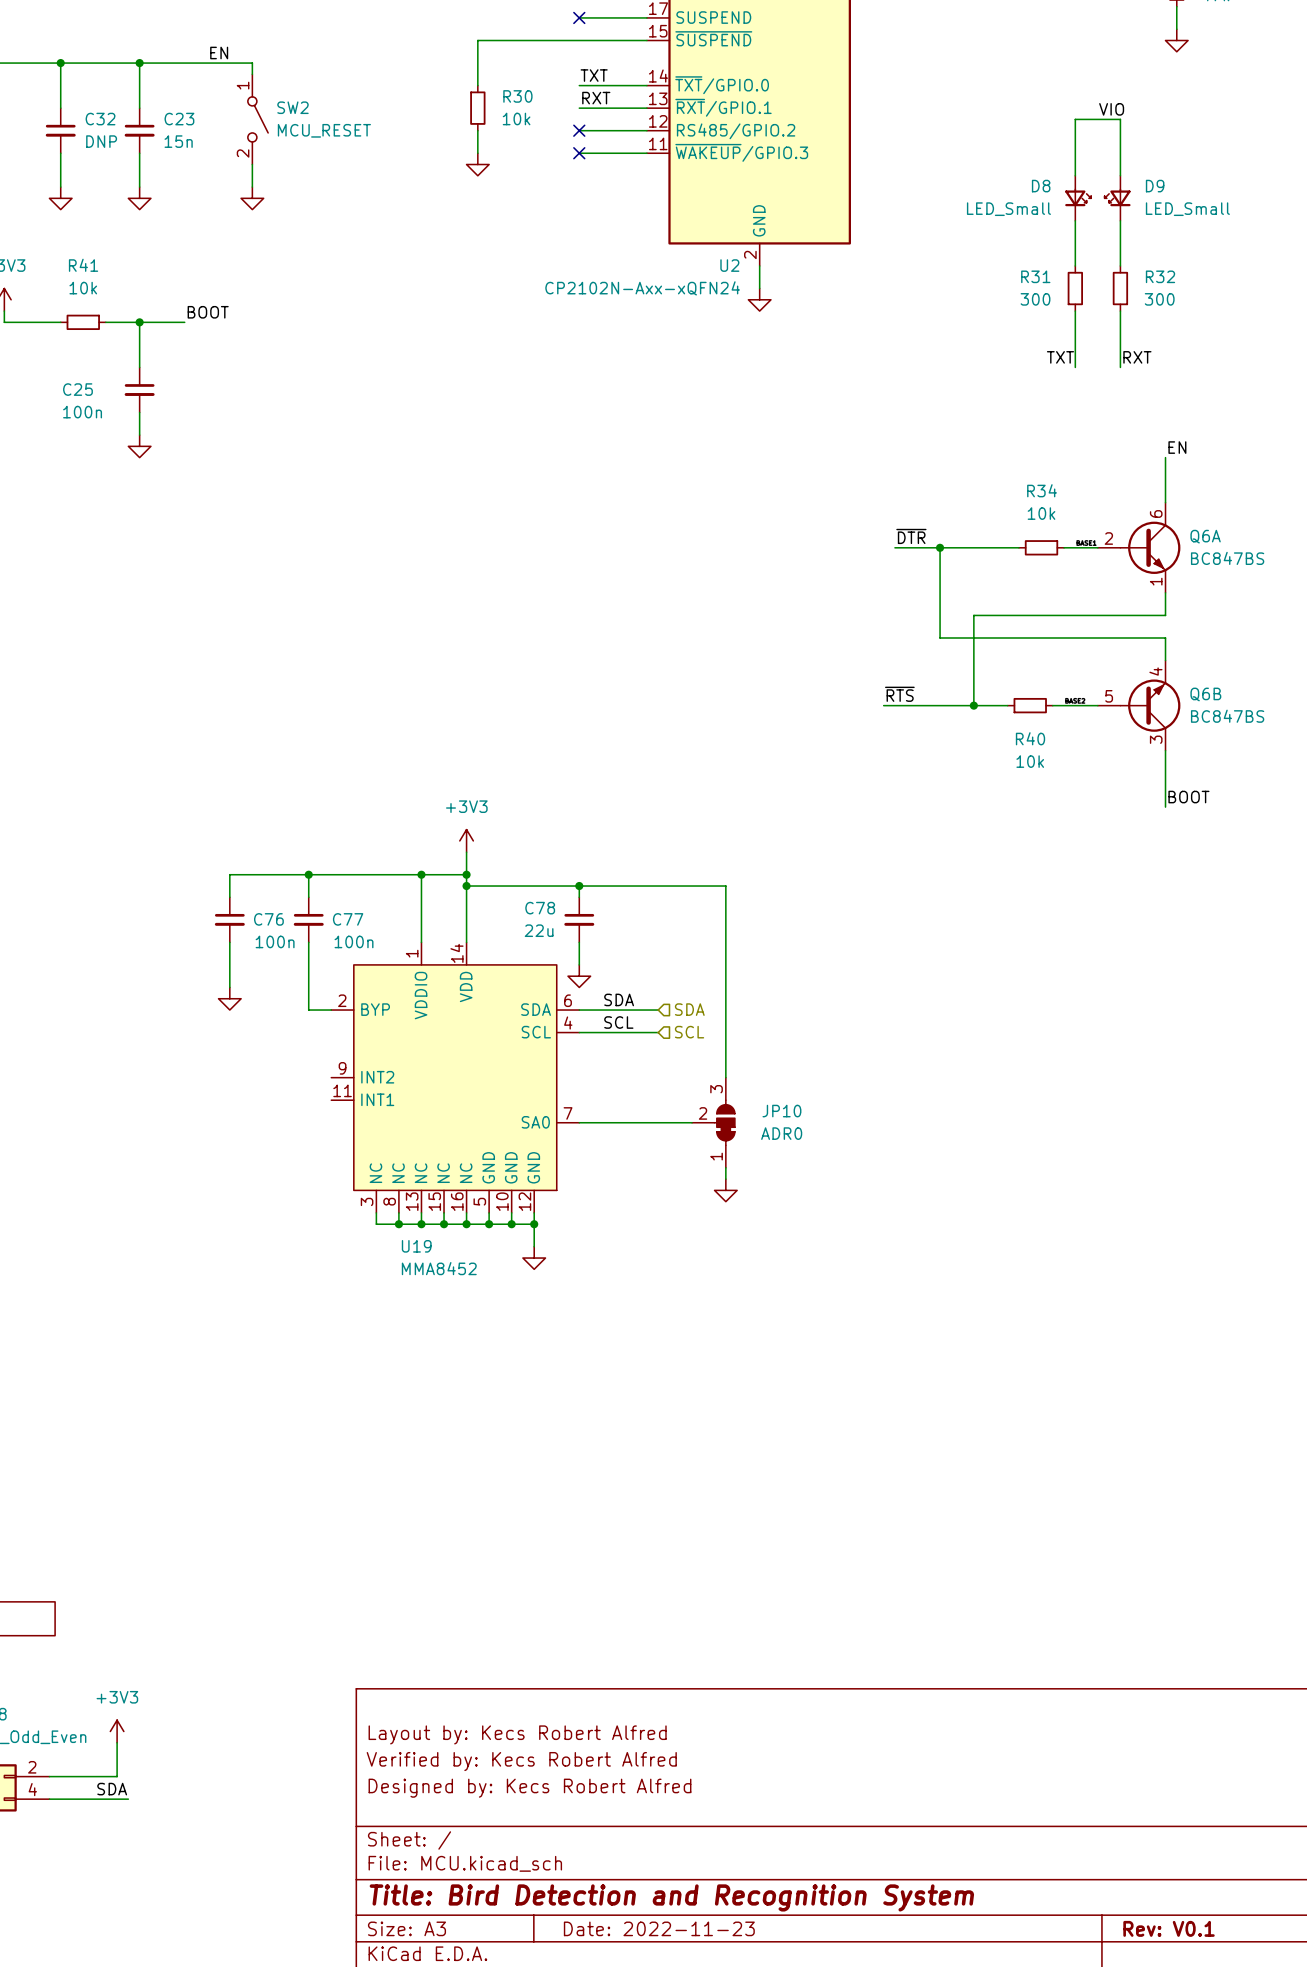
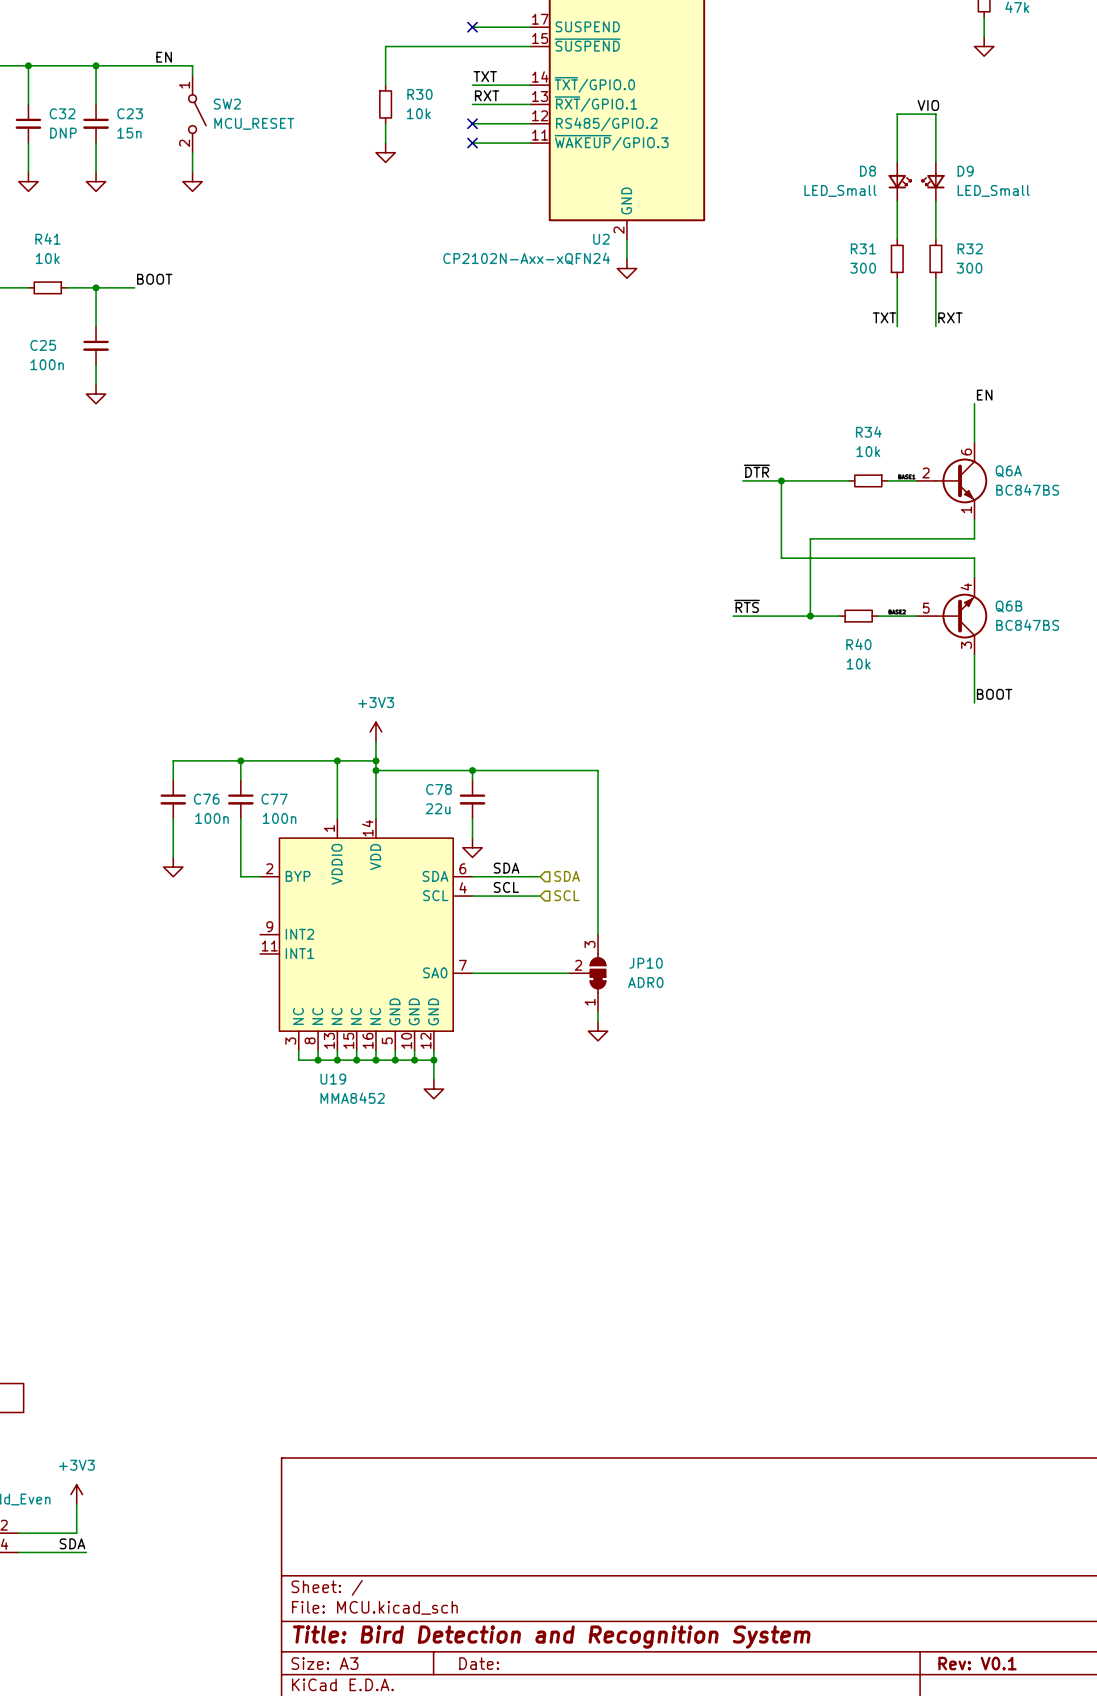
title block: Layout by: Kecs Robert Alfred (517, 1734) -> none
title block: Verified by: Kecs Robert Alfred (521, 1761) -> none
title block: Designed by: Kecs Robert Alfred (529, 1788) -> none
title block: Date: 2022-11-23 (659, 1928) -> Date: (479, 1663)

